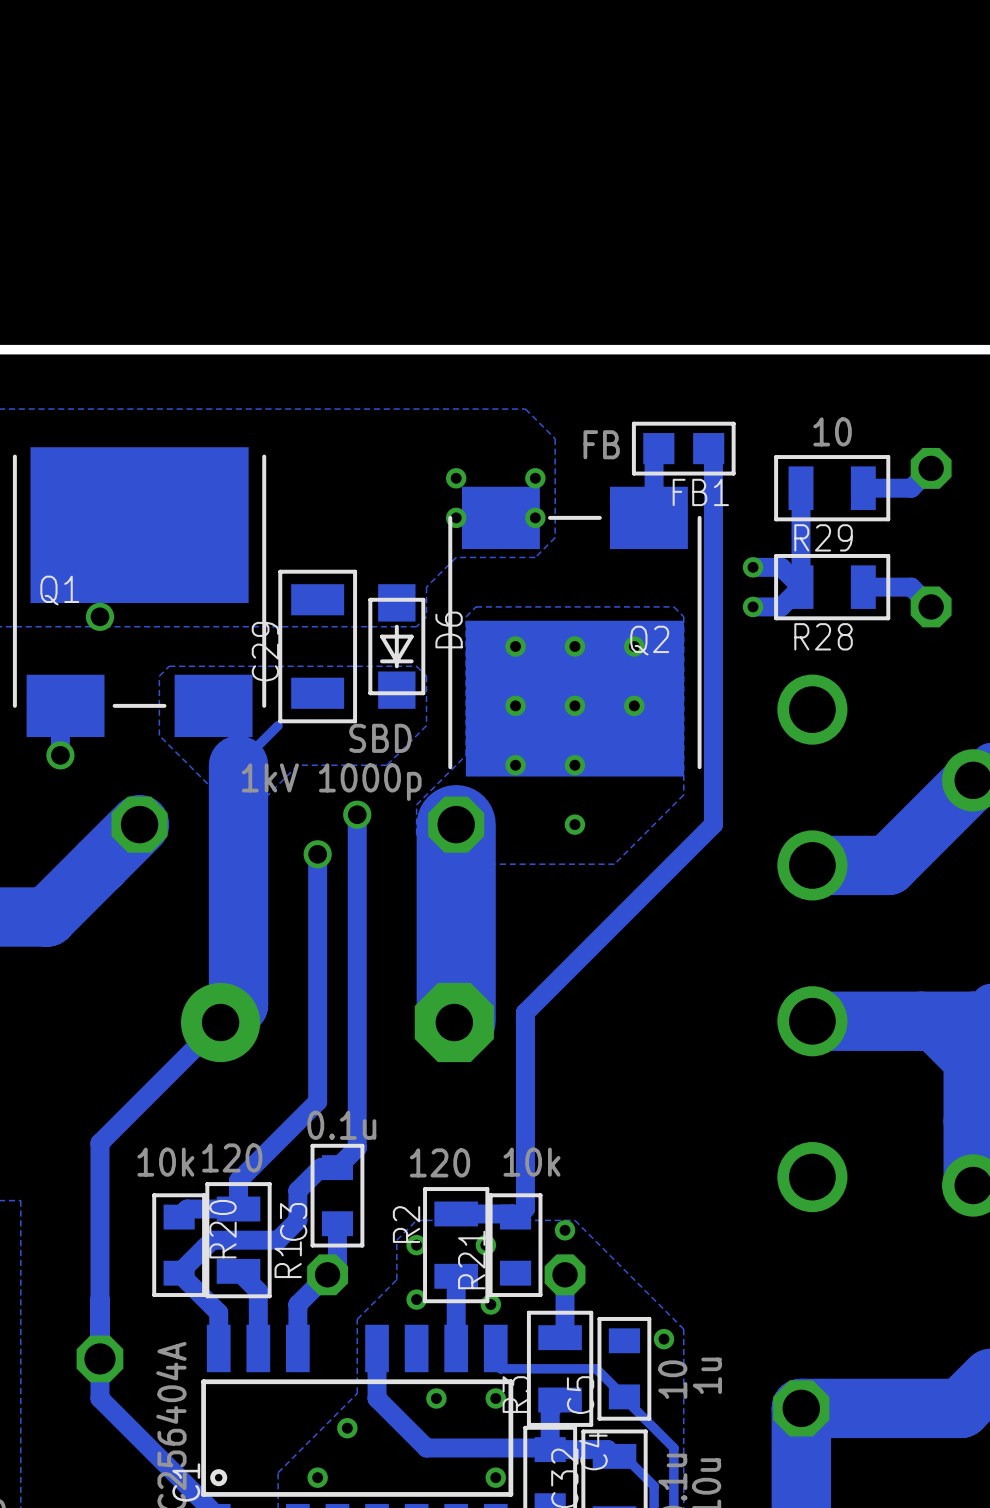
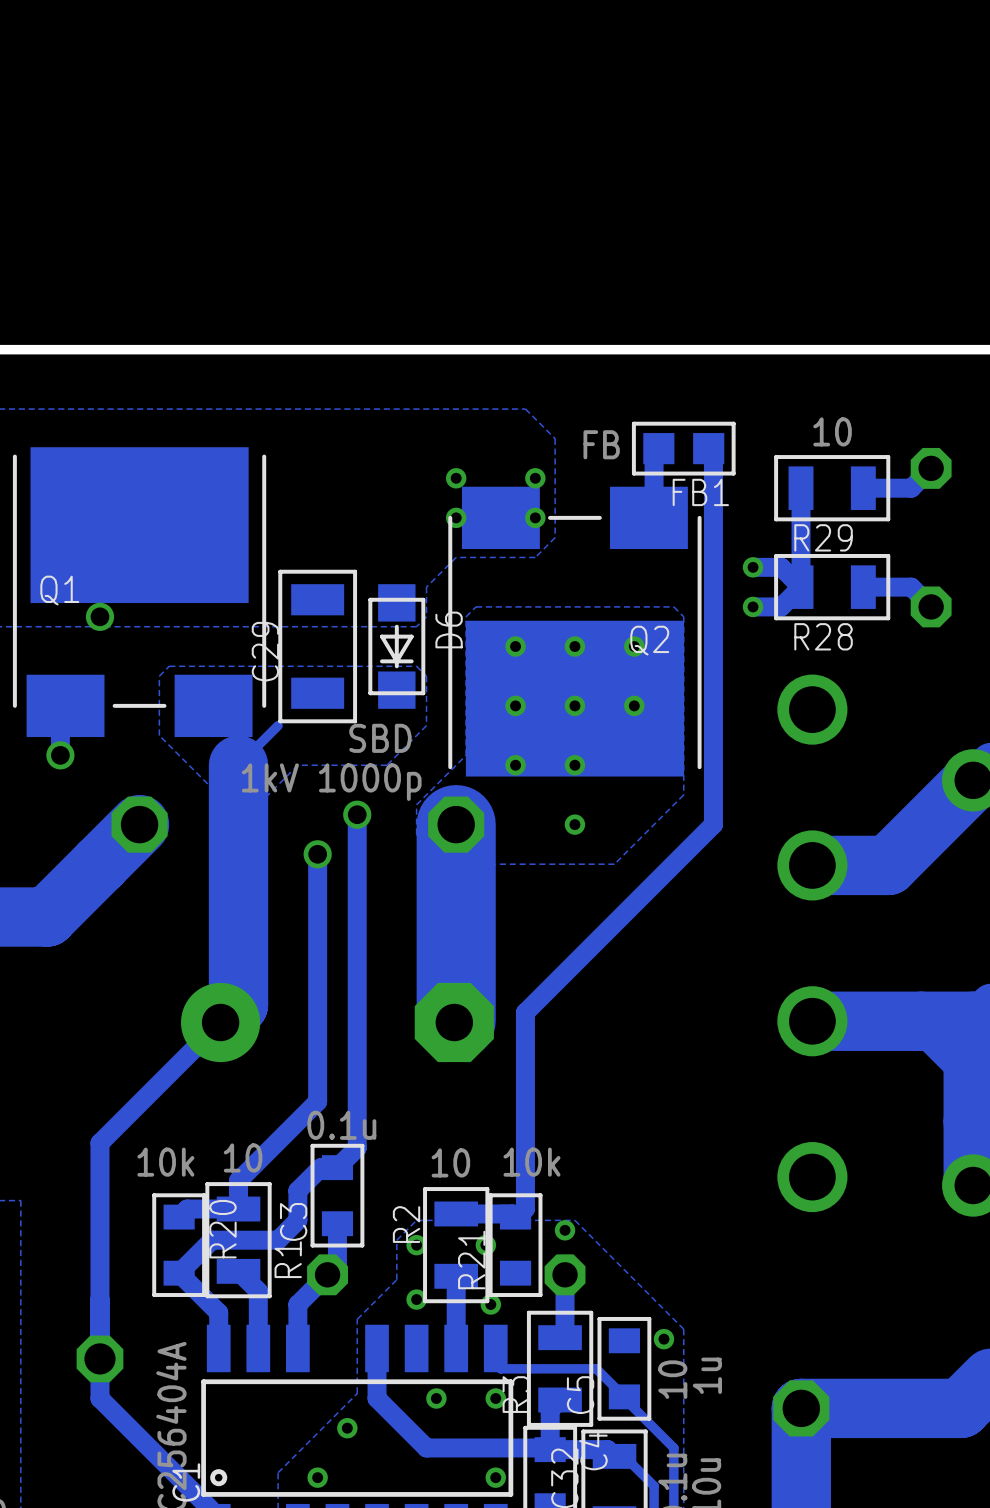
R1 value: 120 (232, 1157) -> 10 (243, 1157)
R2 value: 120 (440, 1162) -> 10 (450, 1162)

